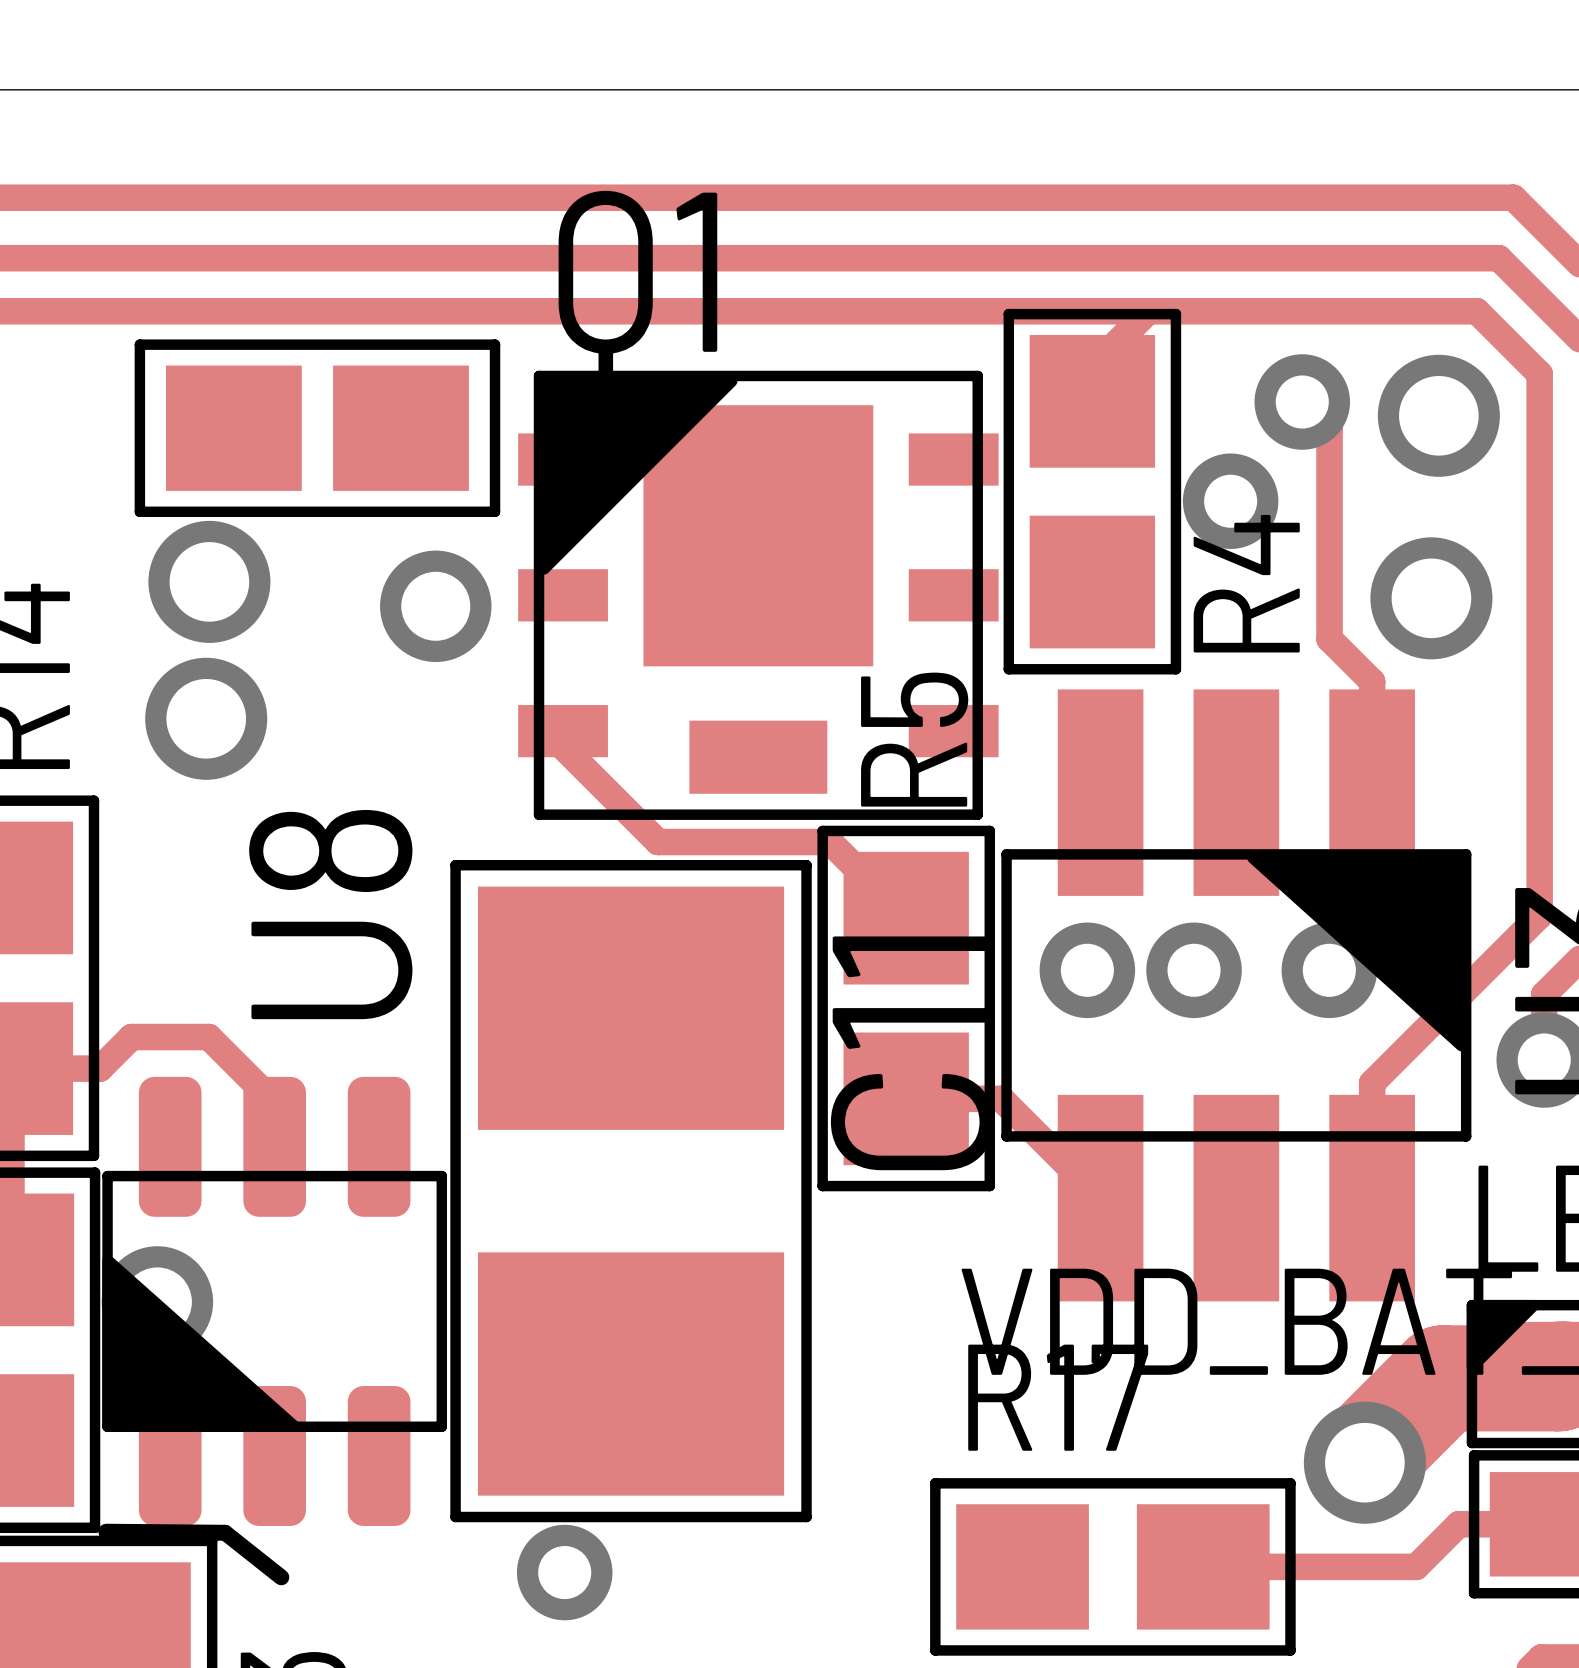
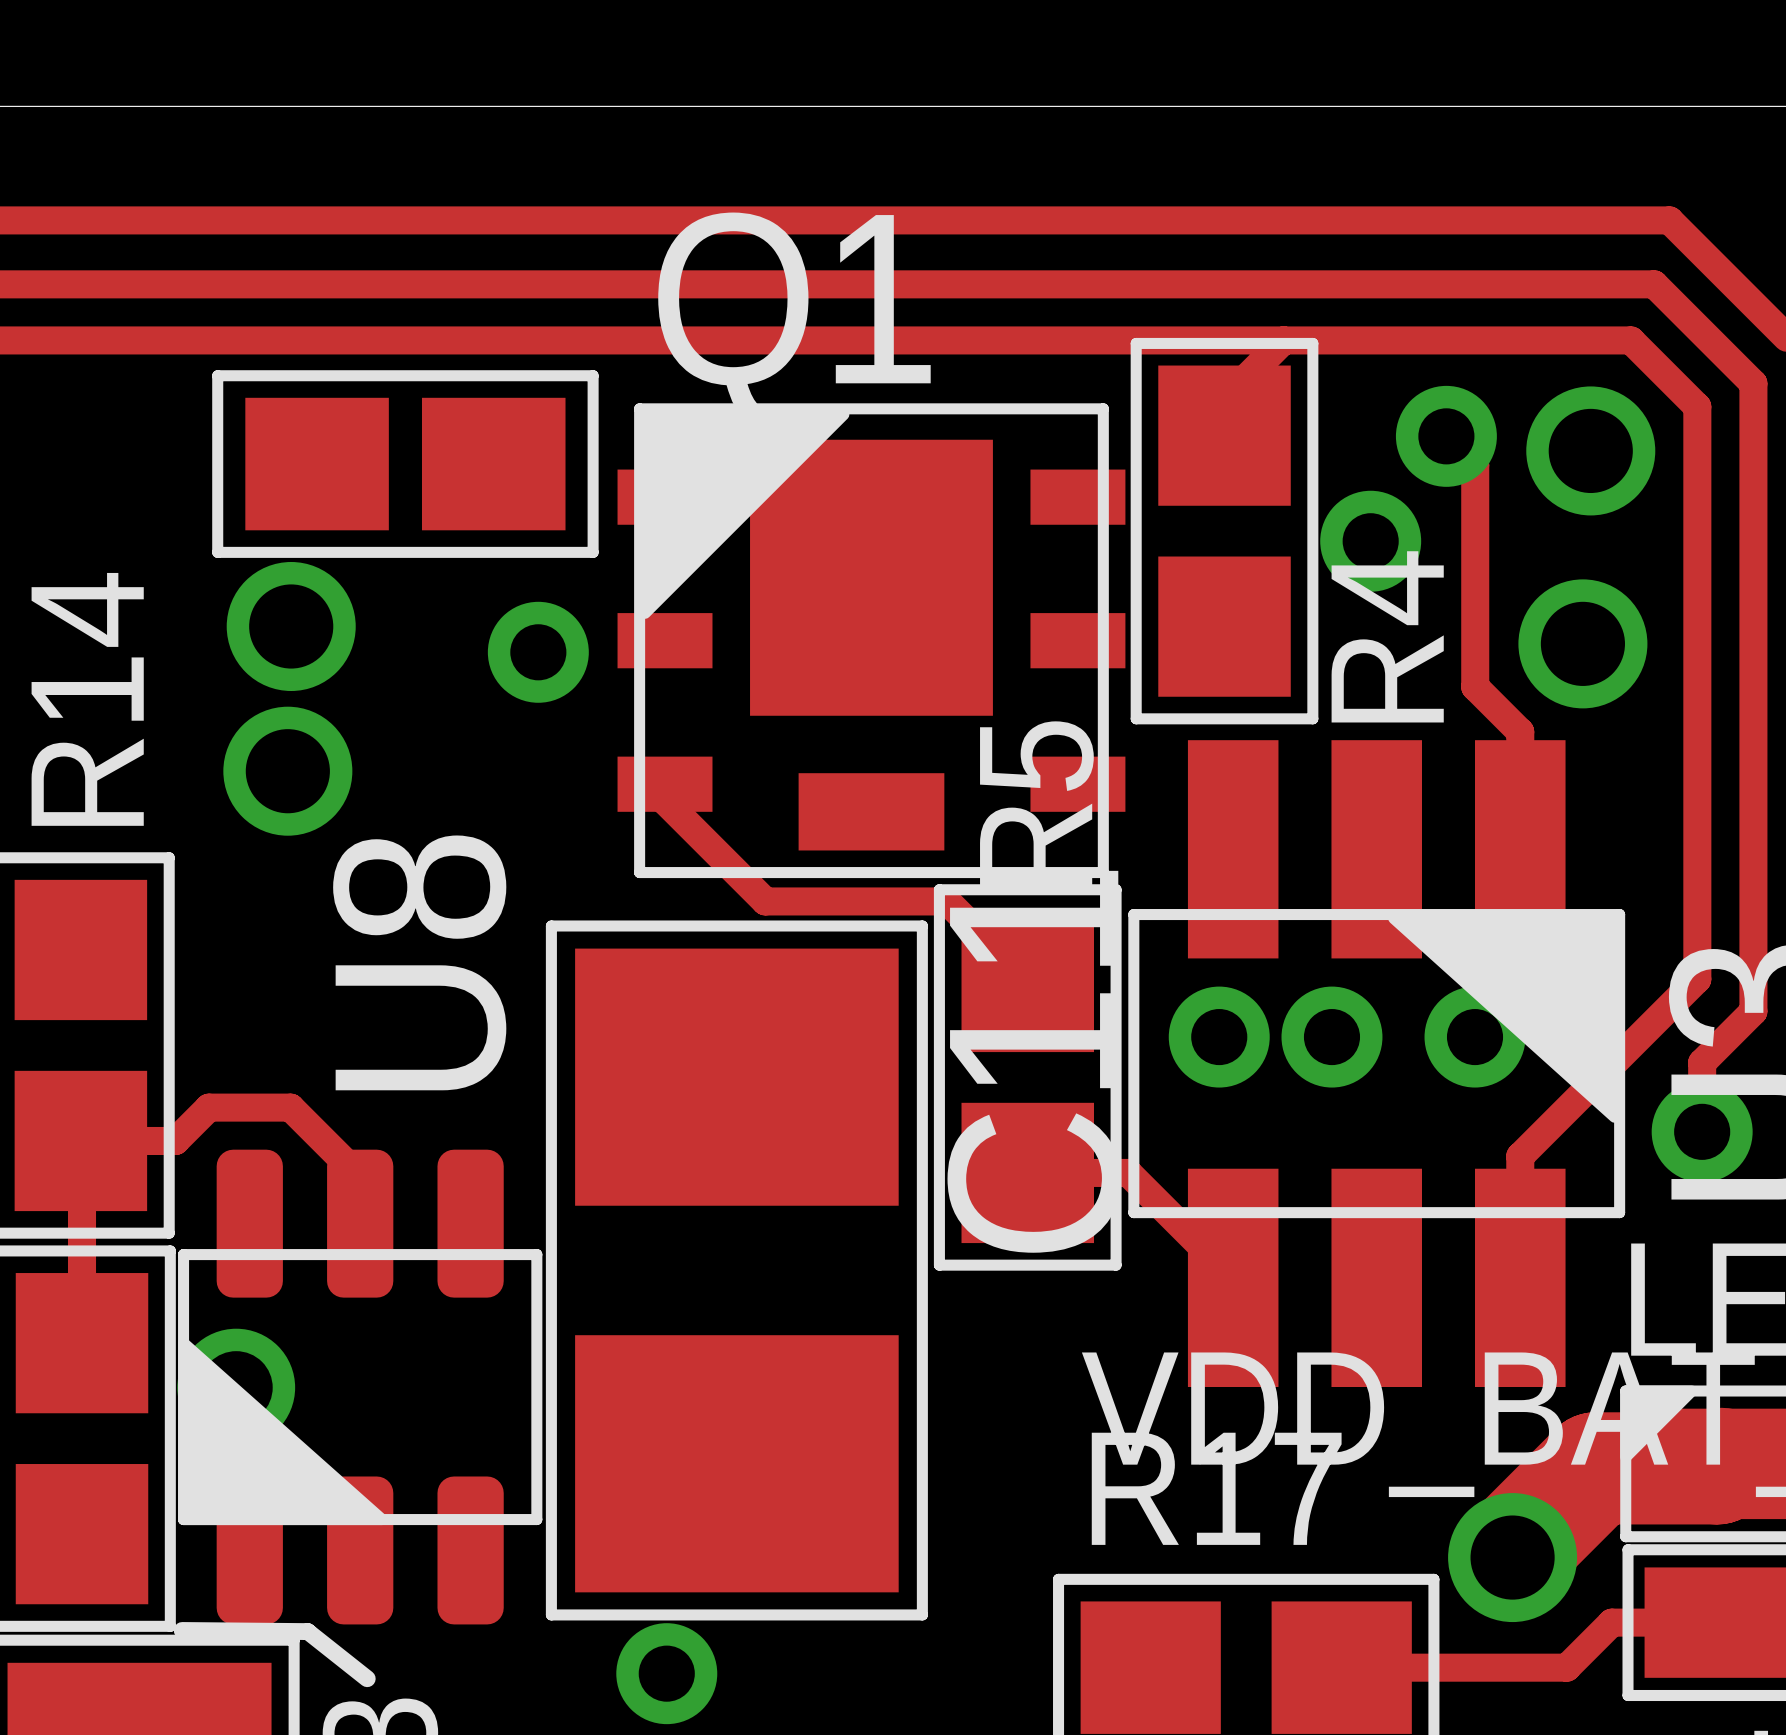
via size: [380, 550, 492, 663] -> [487, 601, 589, 703]

